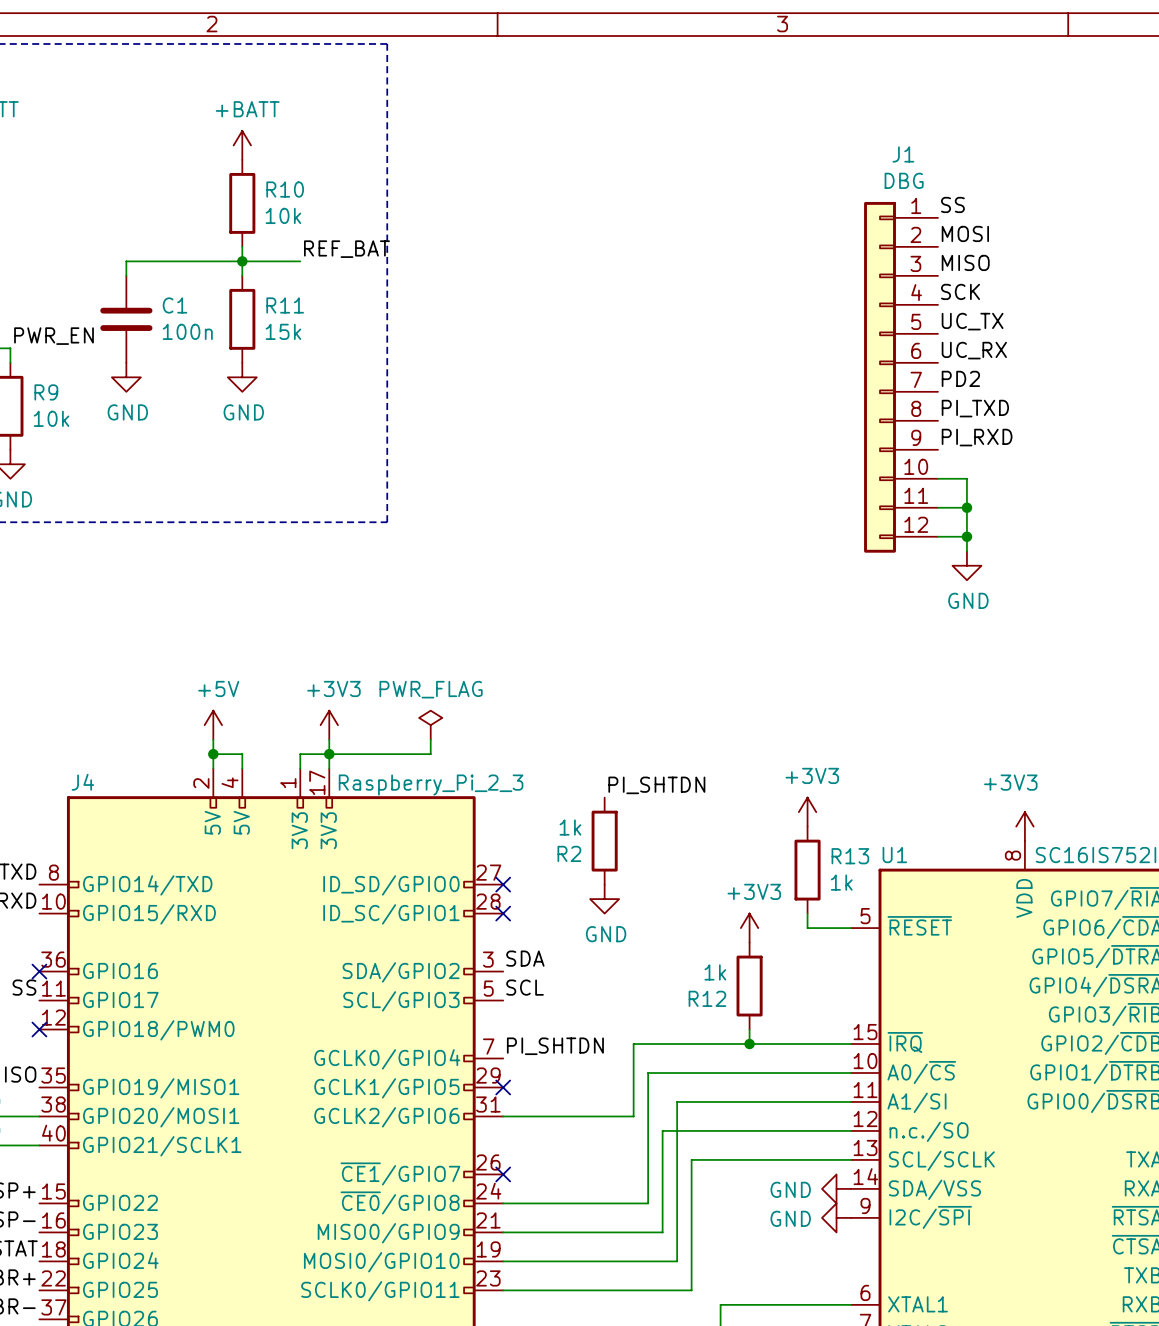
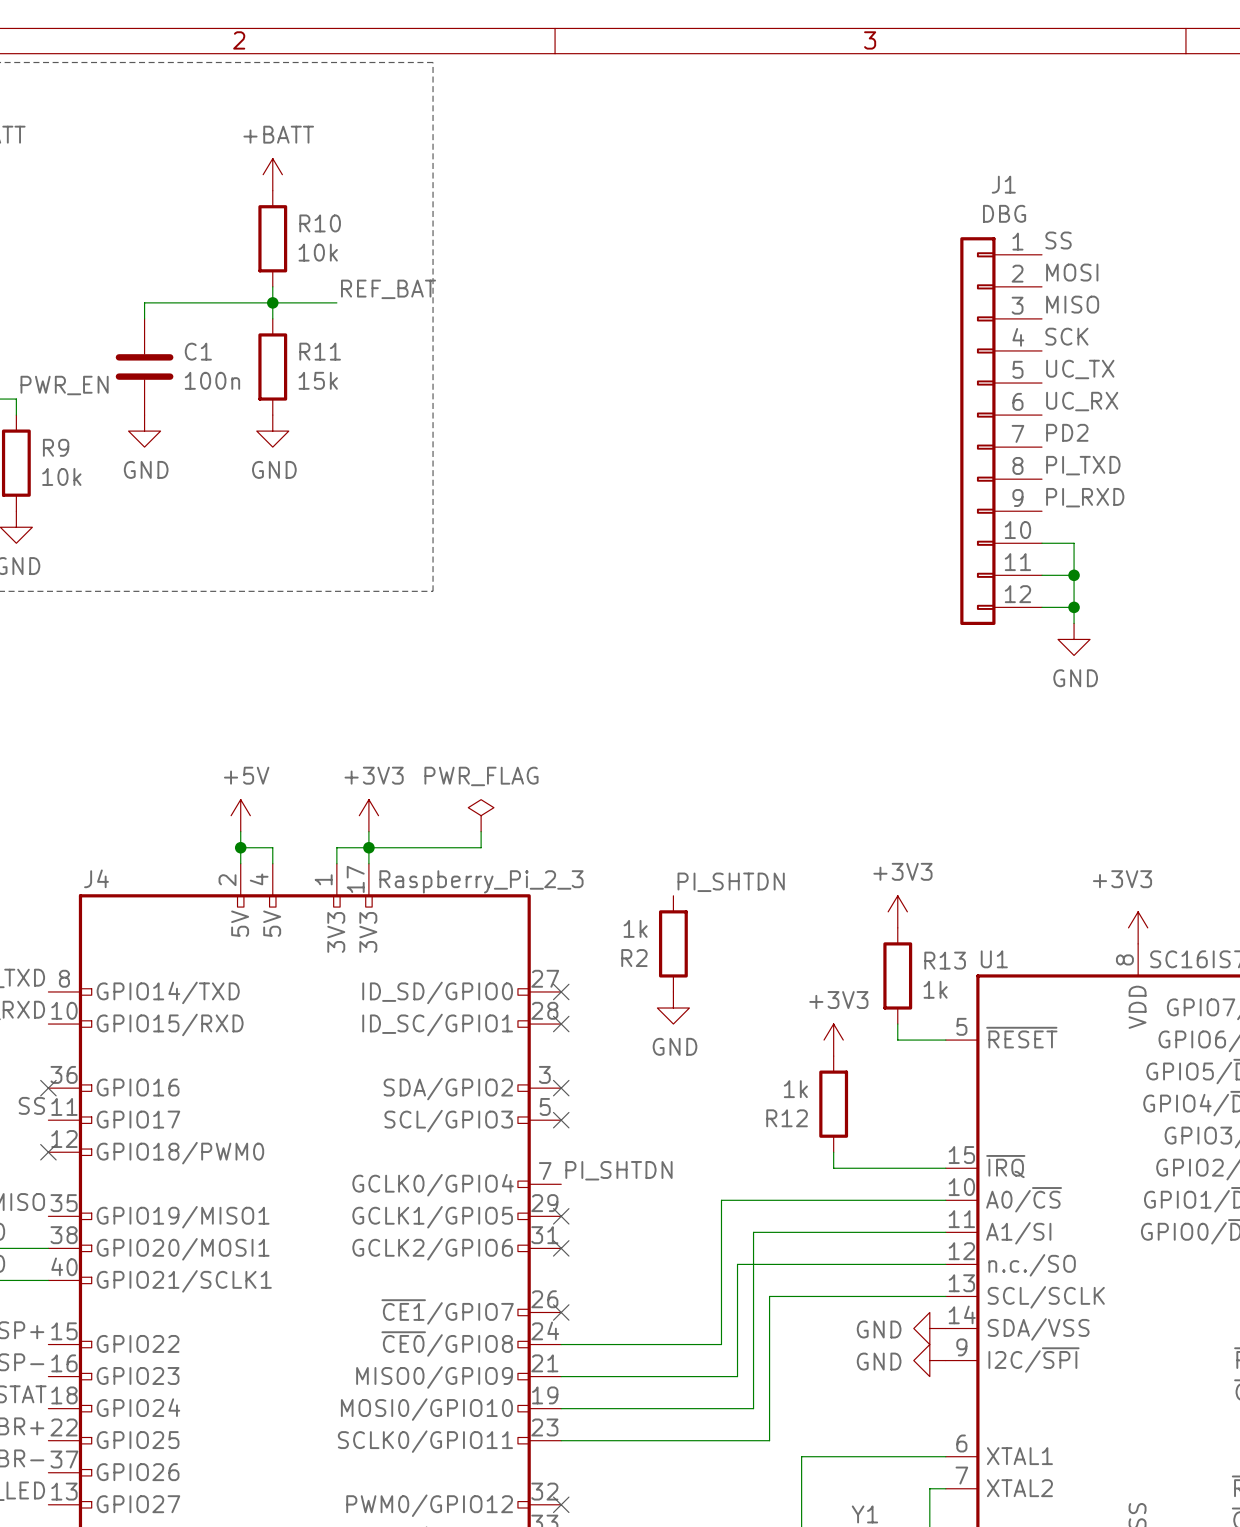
label: SDA (525, 958) -> none
no-connect mark: none -> (561, 1088)
label: SCL (525, 987) -> none
no-connect mark: none -> (561, 1120)
wire: (749, 1044) (633, 1044) (633, 1116) (503, 1116) -> none
junction: (749, 1044) -> none
no-connect mark: none -> (561, 1248)

